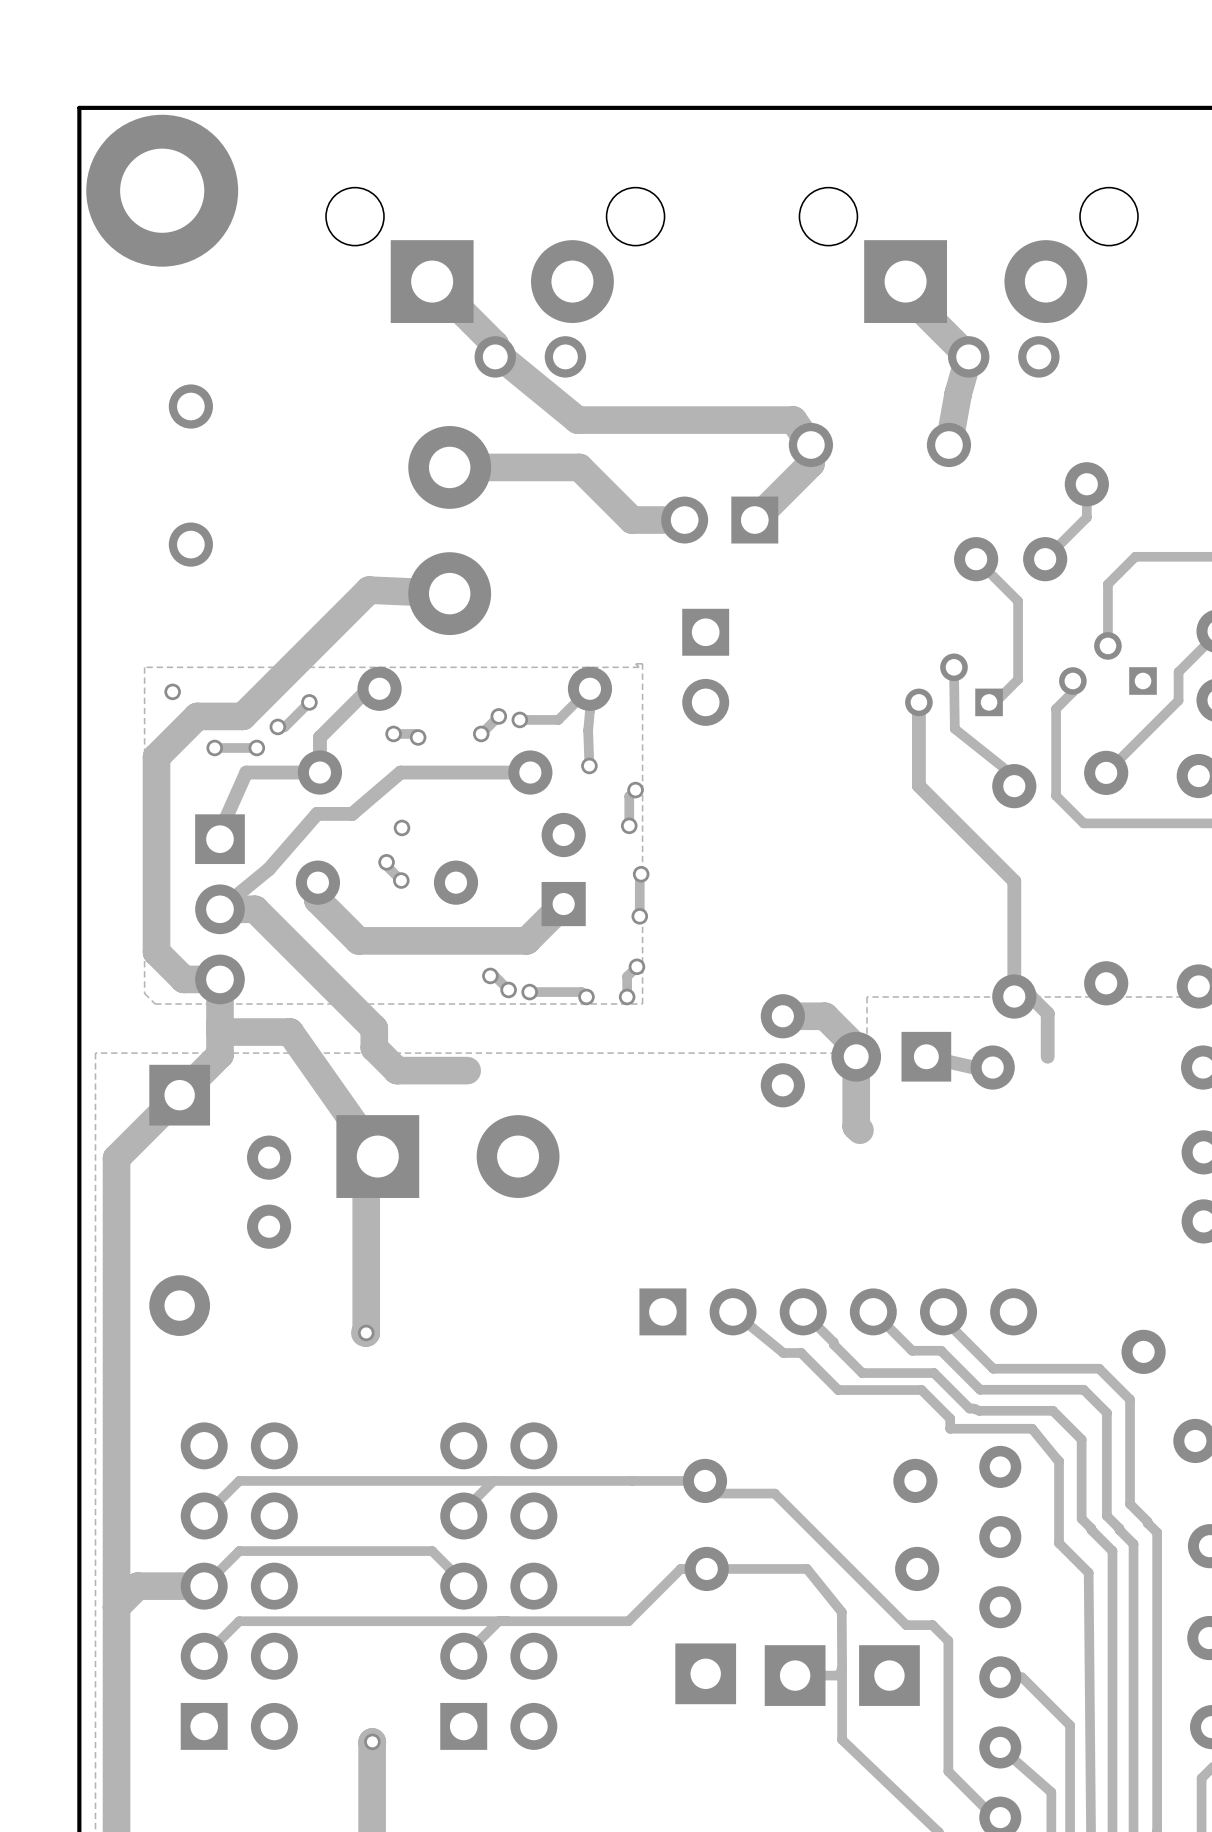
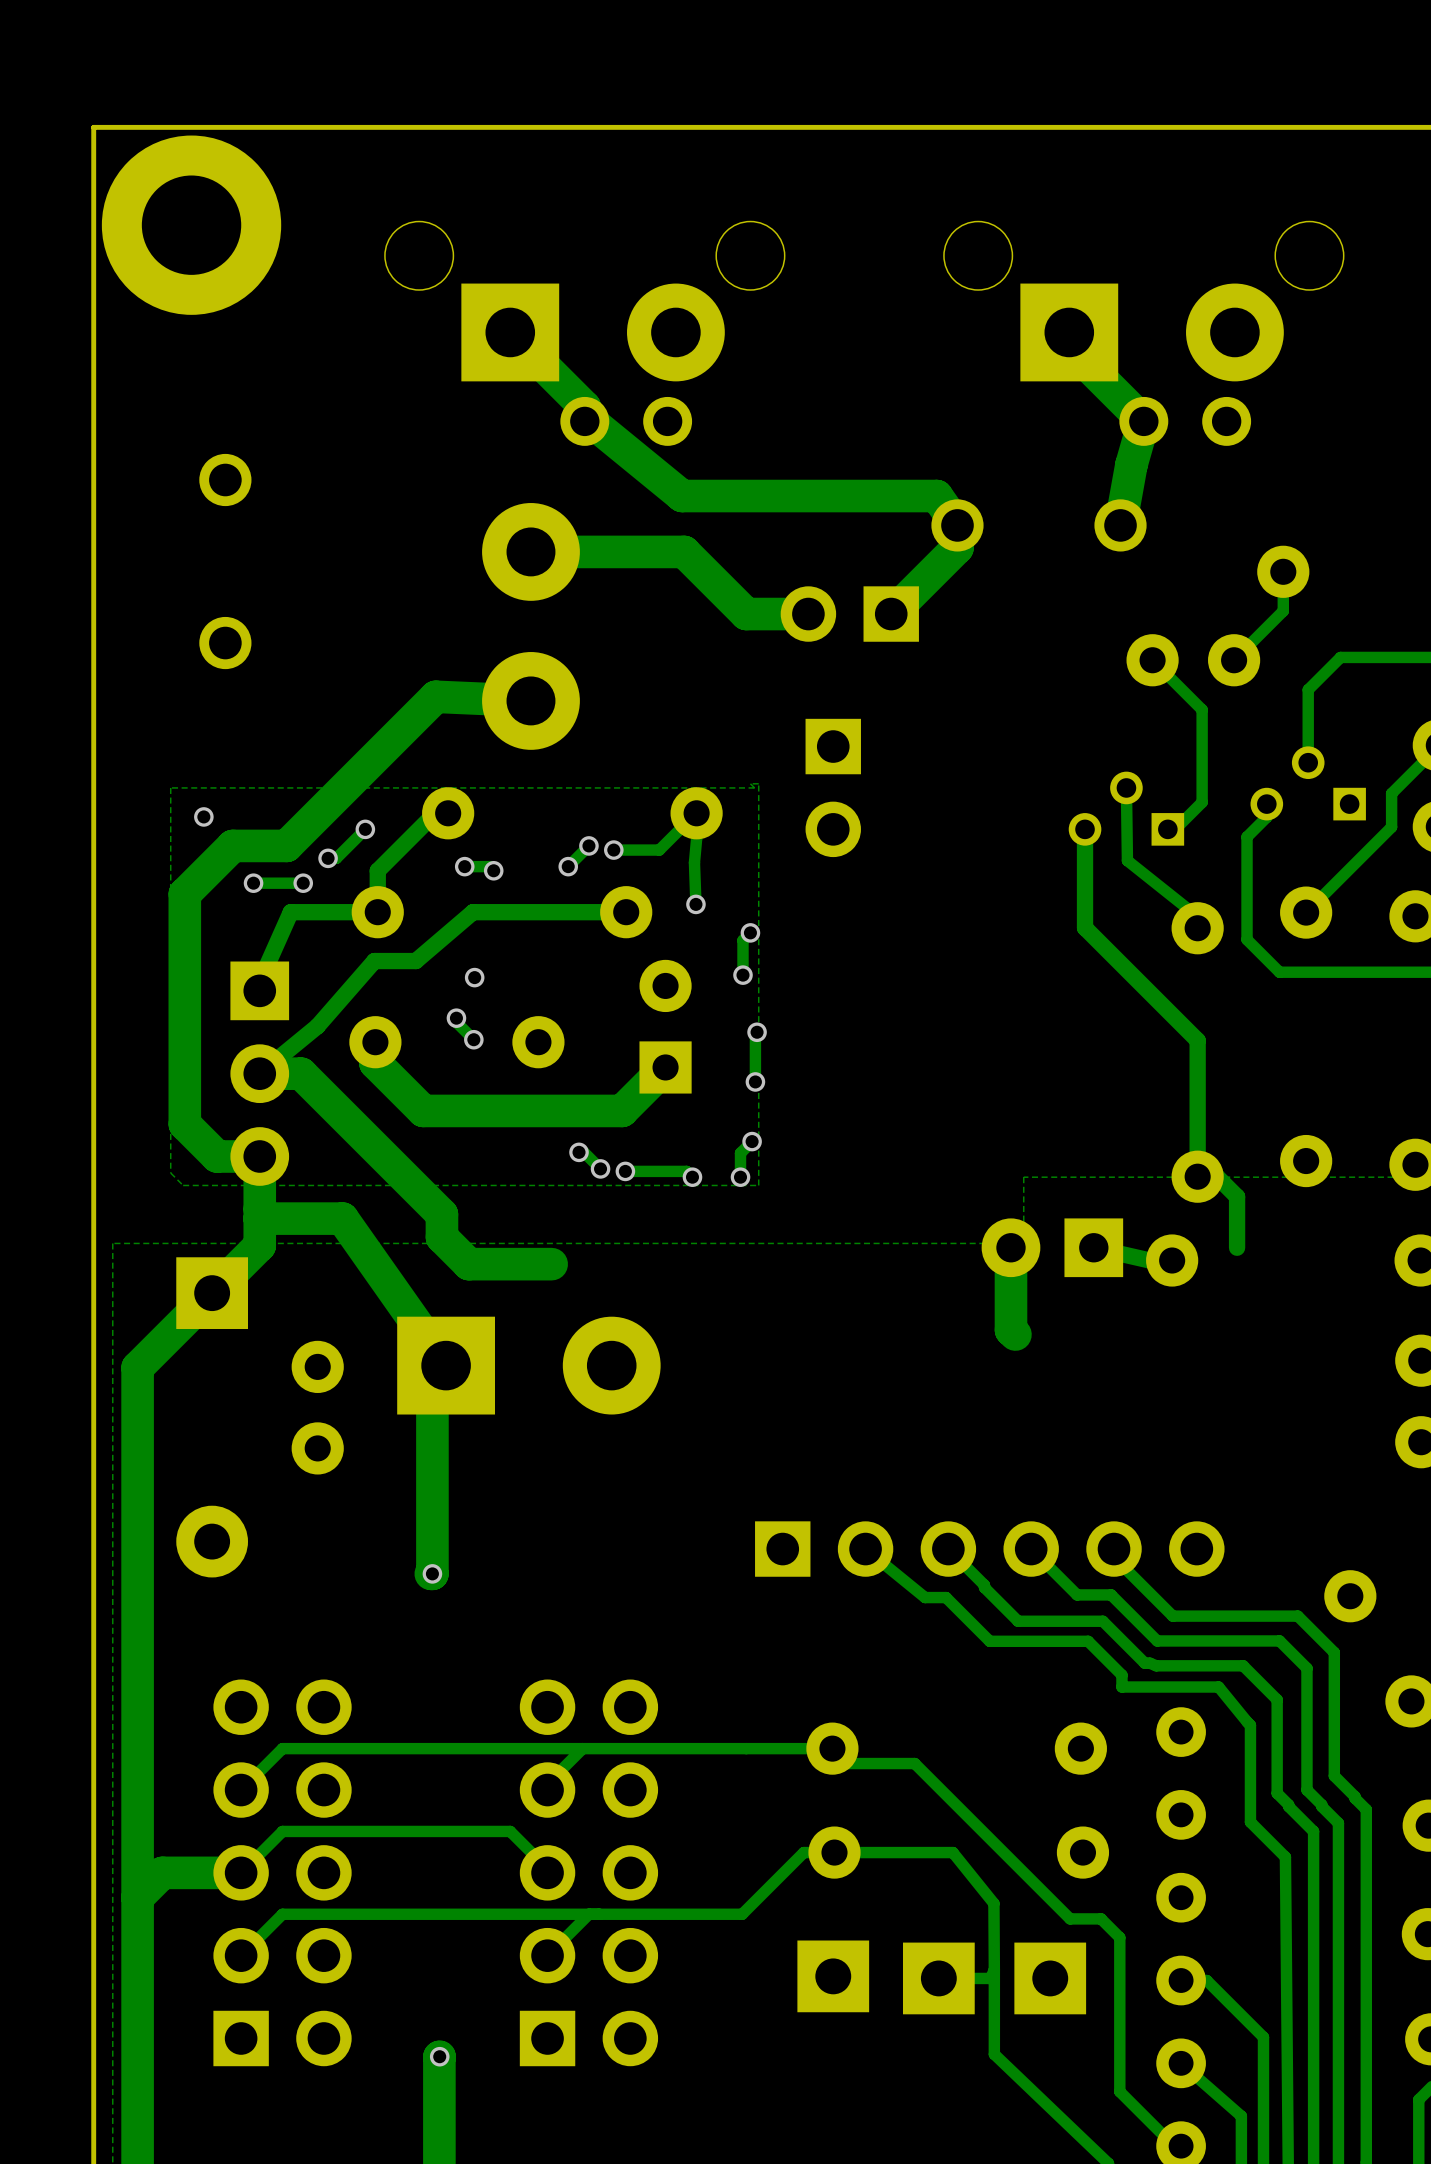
track: (782, 1016) (824, 1016) (856, 1047) -> none
part: (782, 1050) -> none

